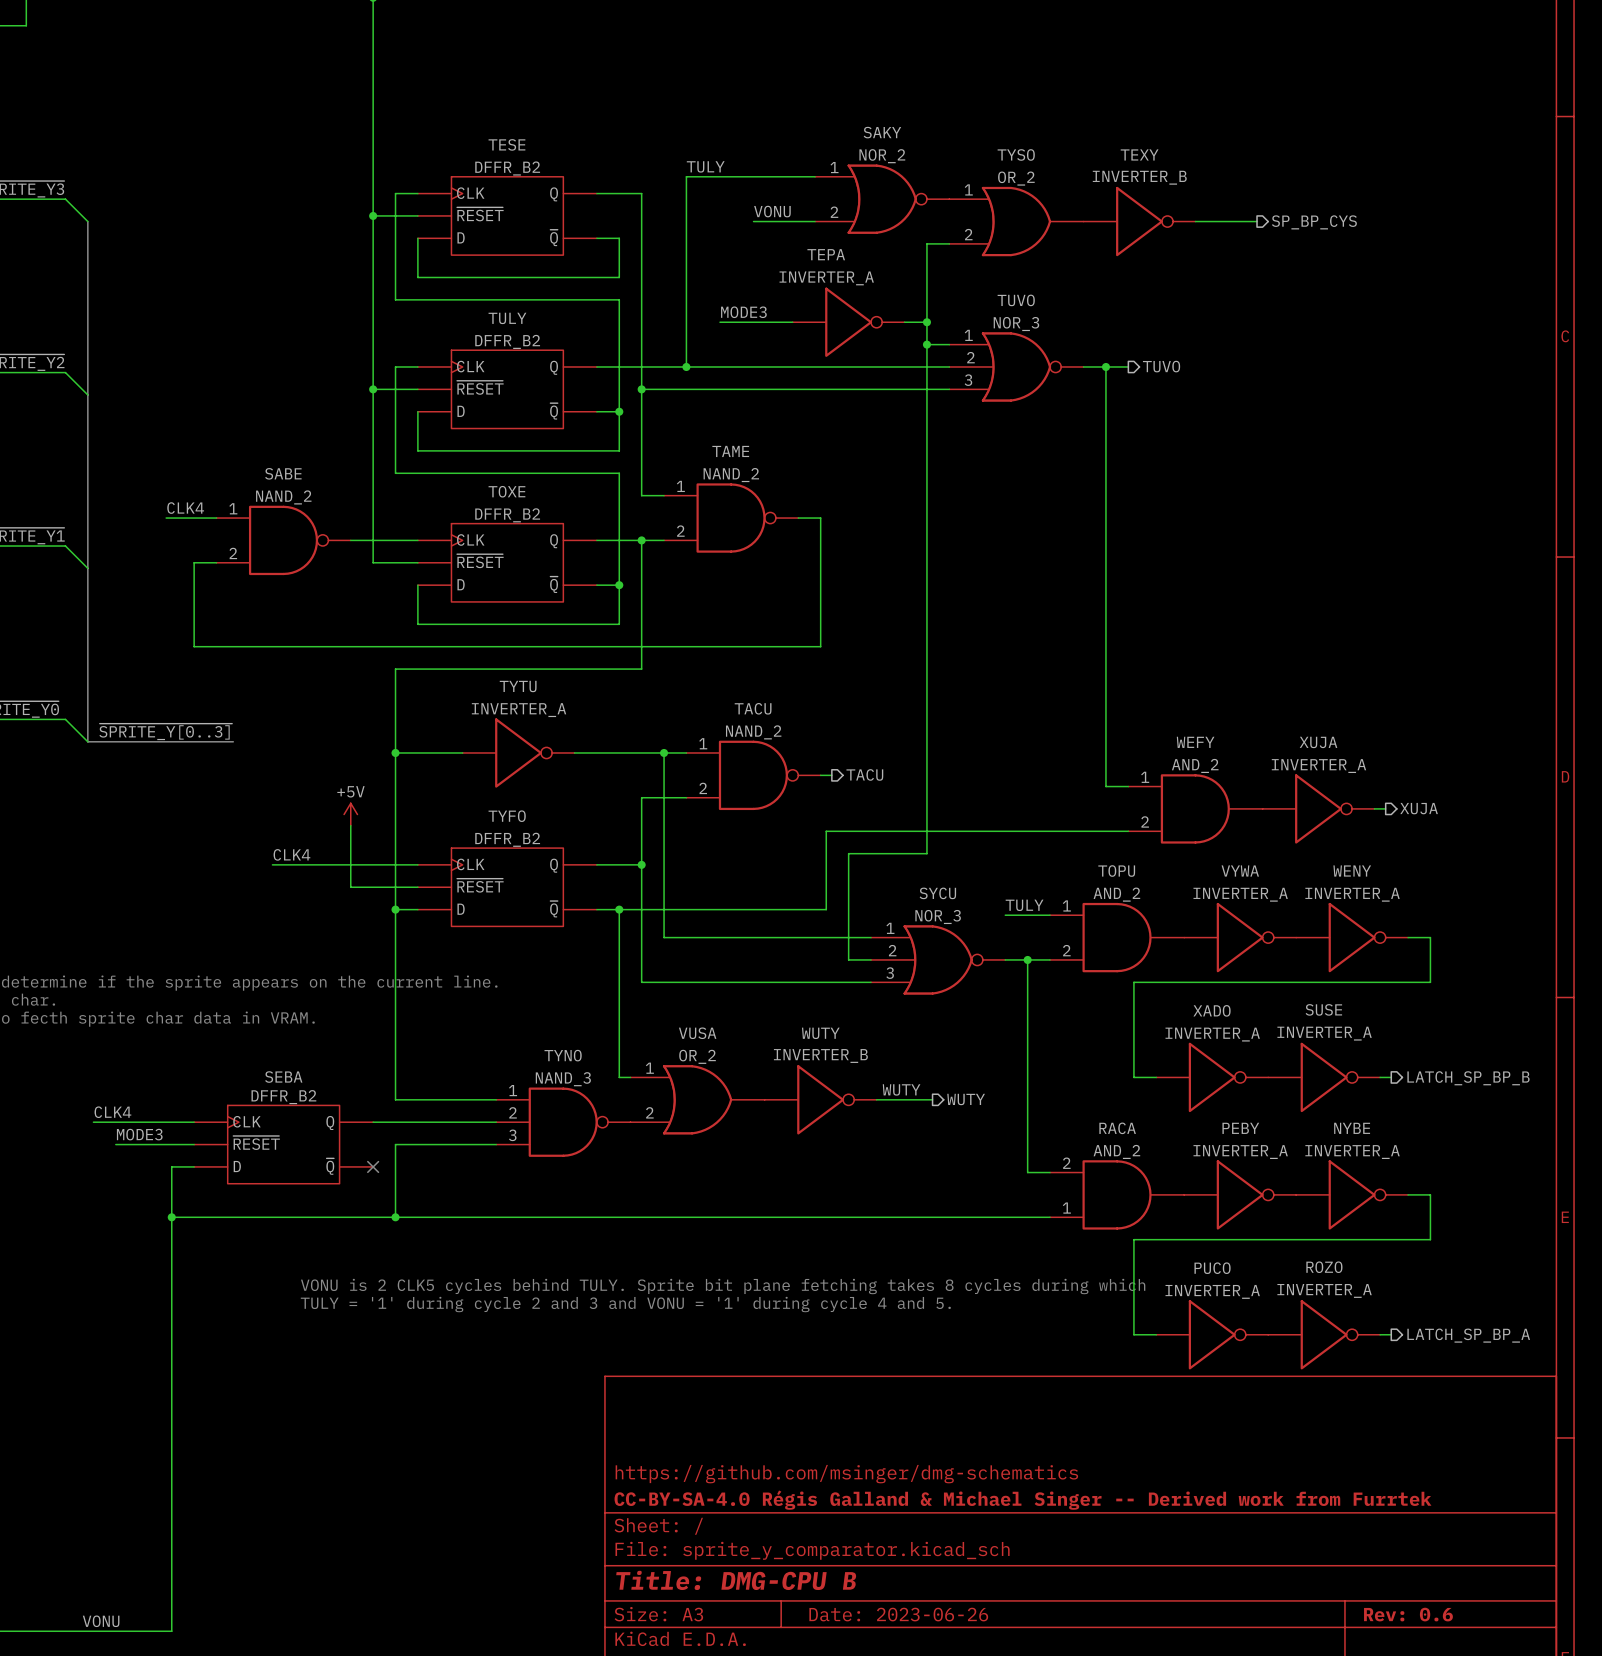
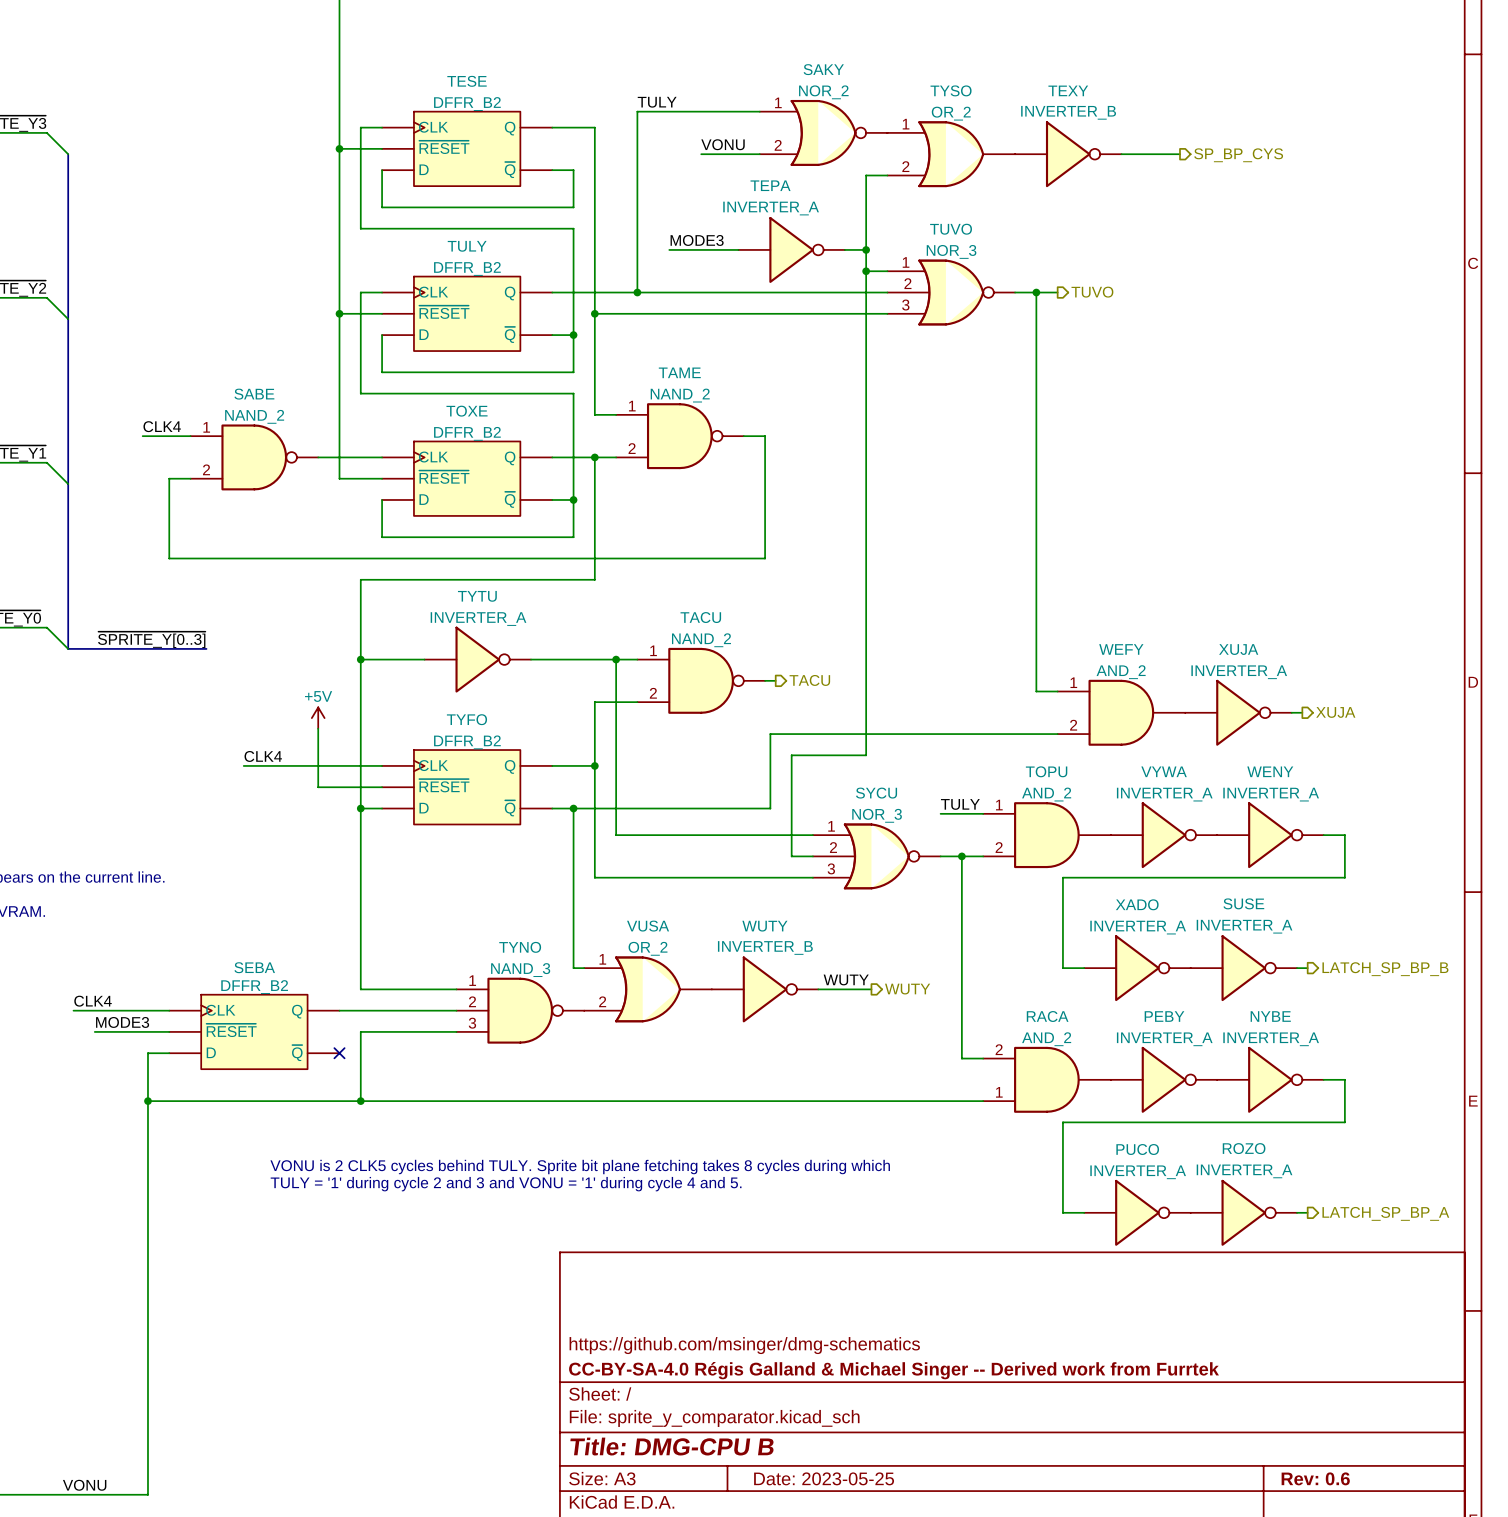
title block: Date: 2023-06-26 (898, 1614) -> Date: 2023-05-25 (824, 1478)

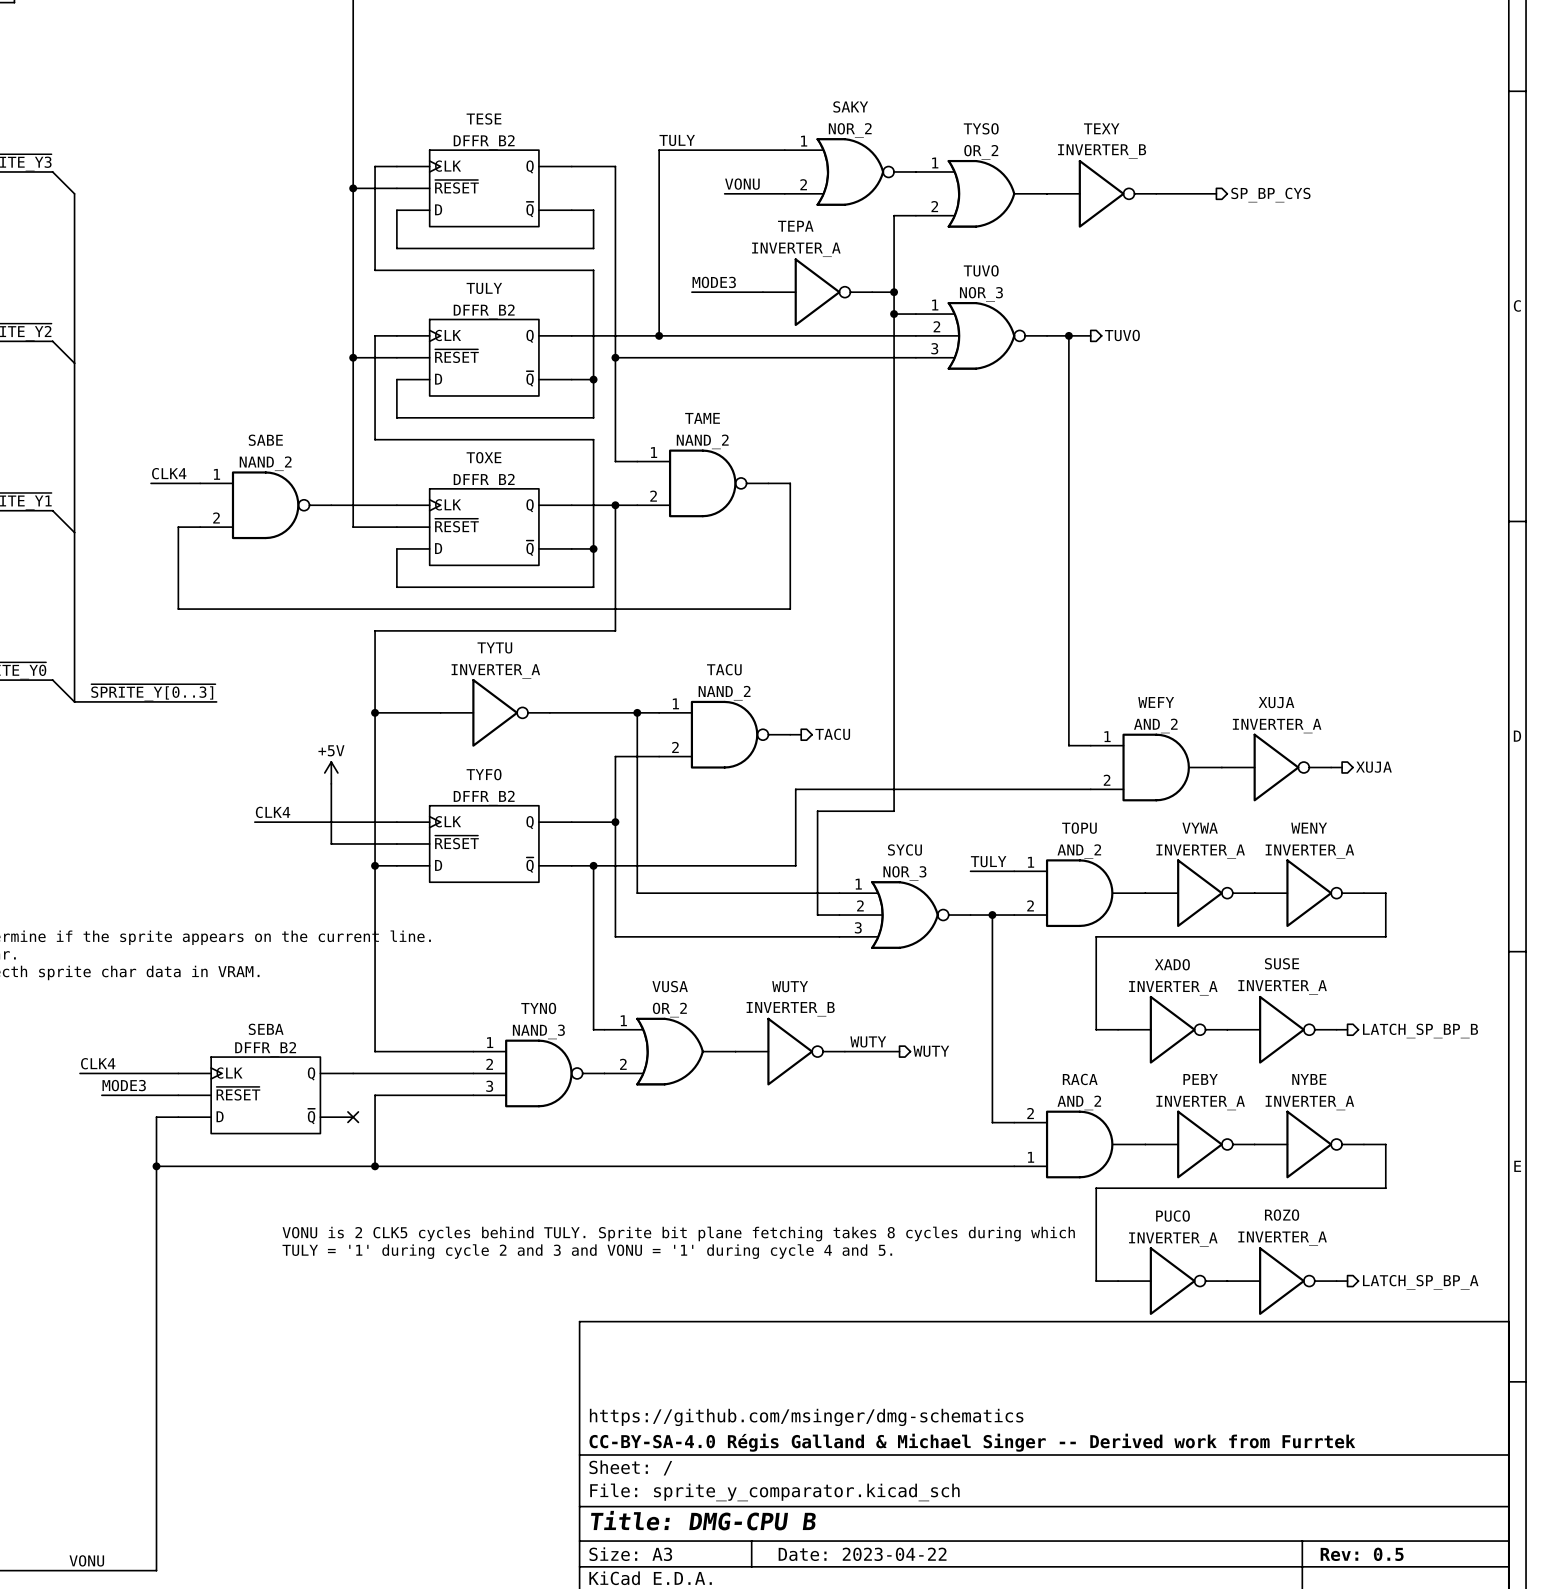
title block: Date: 2023-05-25 (824, 1478) -> Date: 2023-04-22 (862, 1554)
title block: Rev: 0.6 (1315, 1478) -> Rev: 0.5 (1362, 1554)

